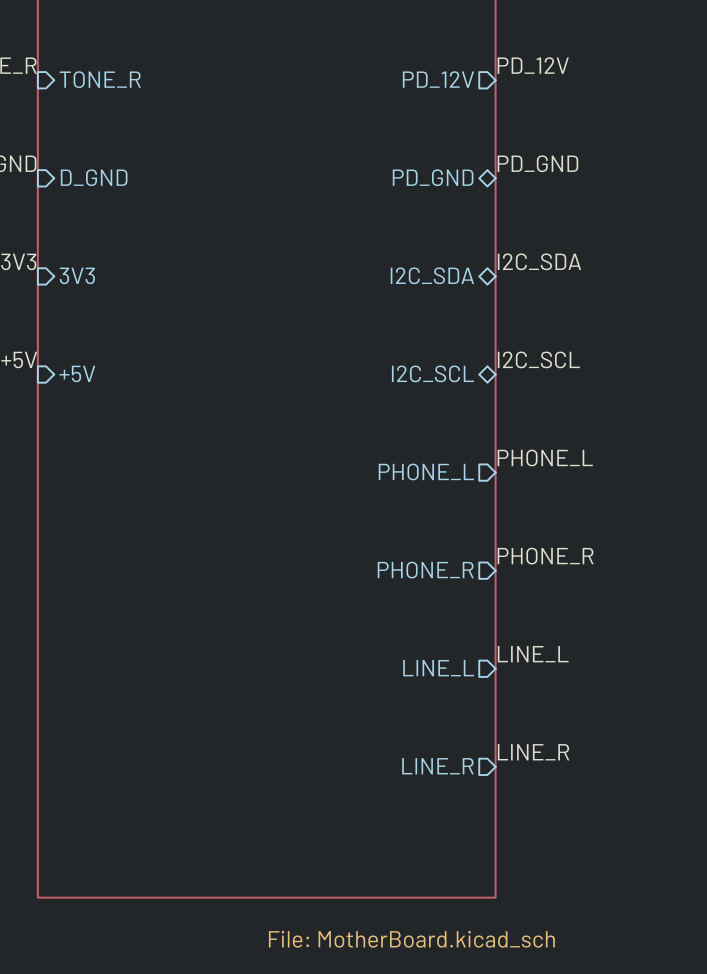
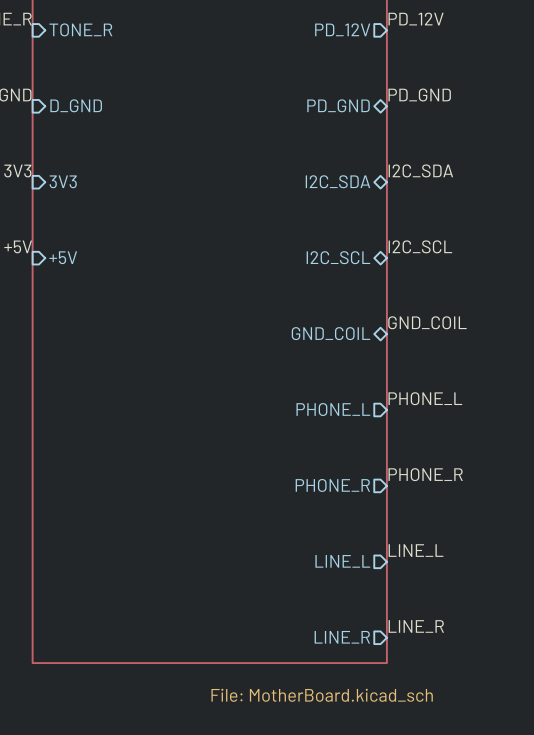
label: PHONE_L (545, 458) -> GND_COIL (427, 322)
sheet pin shape: output (426, 471) -> bidirectional (330, 333)
sheet pin: PHONE_L (426, 471) -> GND_COIL (330, 333)
label: PHONE_R (545, 556) -> PHONE_L (425, 398)
sheet pin: PHONE_R (425, 570) -> PHONE_L (333, 409)
label: LINE_L (533, 654) -> PHONE_R (425, 474)
sheet pin: LINE_L (438, 668) -> PHONE_R (332, 485)
label: LINE_R (533, 752) -> LINE_L (416, 550)
sheet pin: LINE_R (437, 766) -> LINE_L (342, 561)
label: none -> LINE_R (416, 626)
sheet pin: none -> LINE_R (342, 637)

